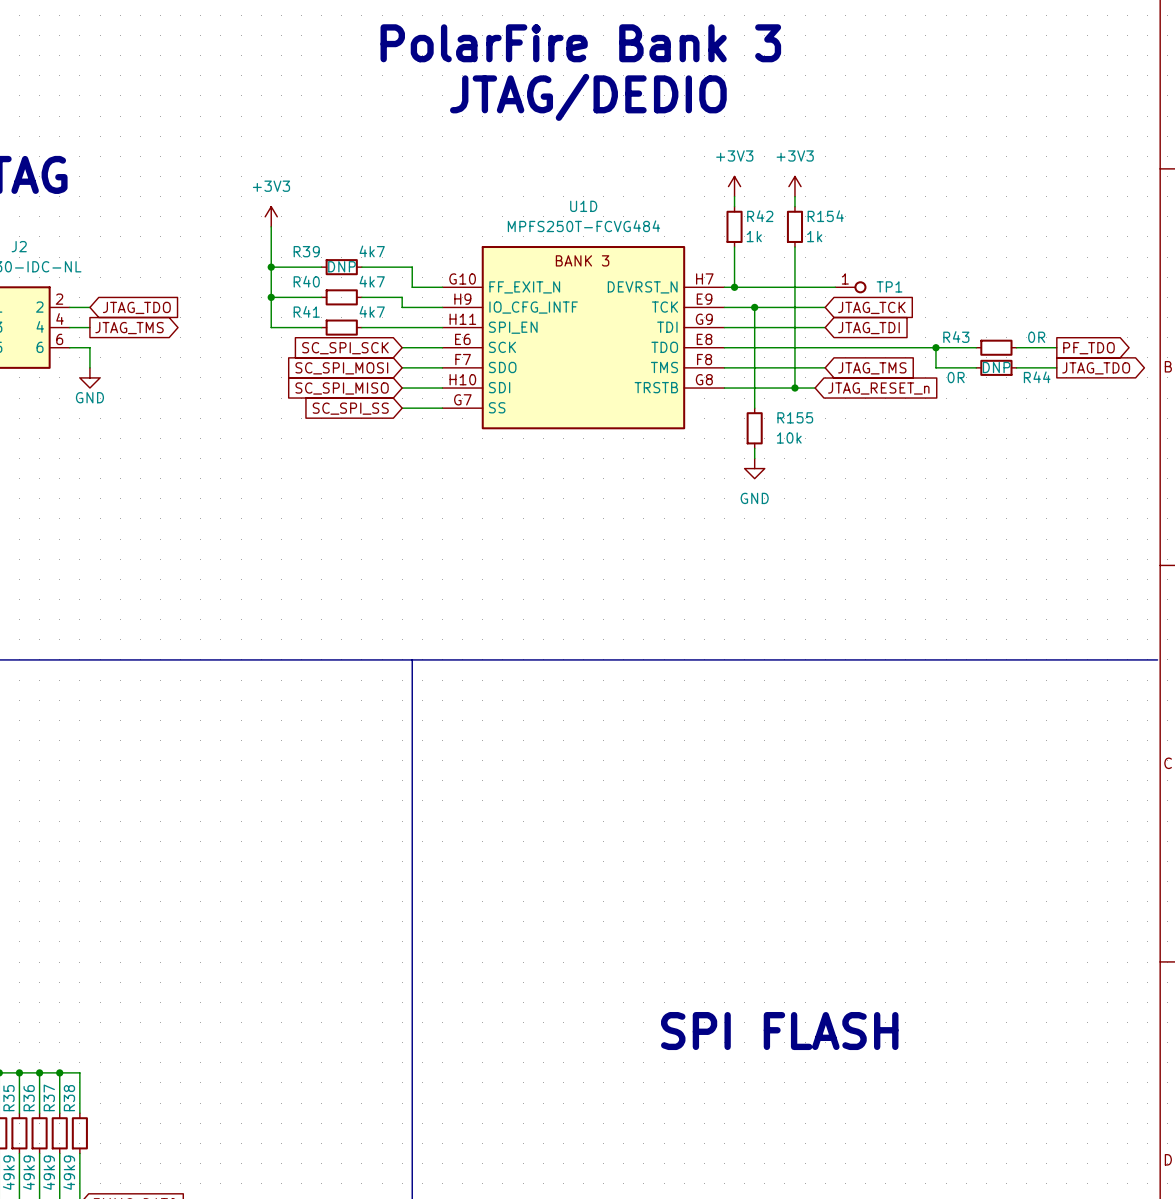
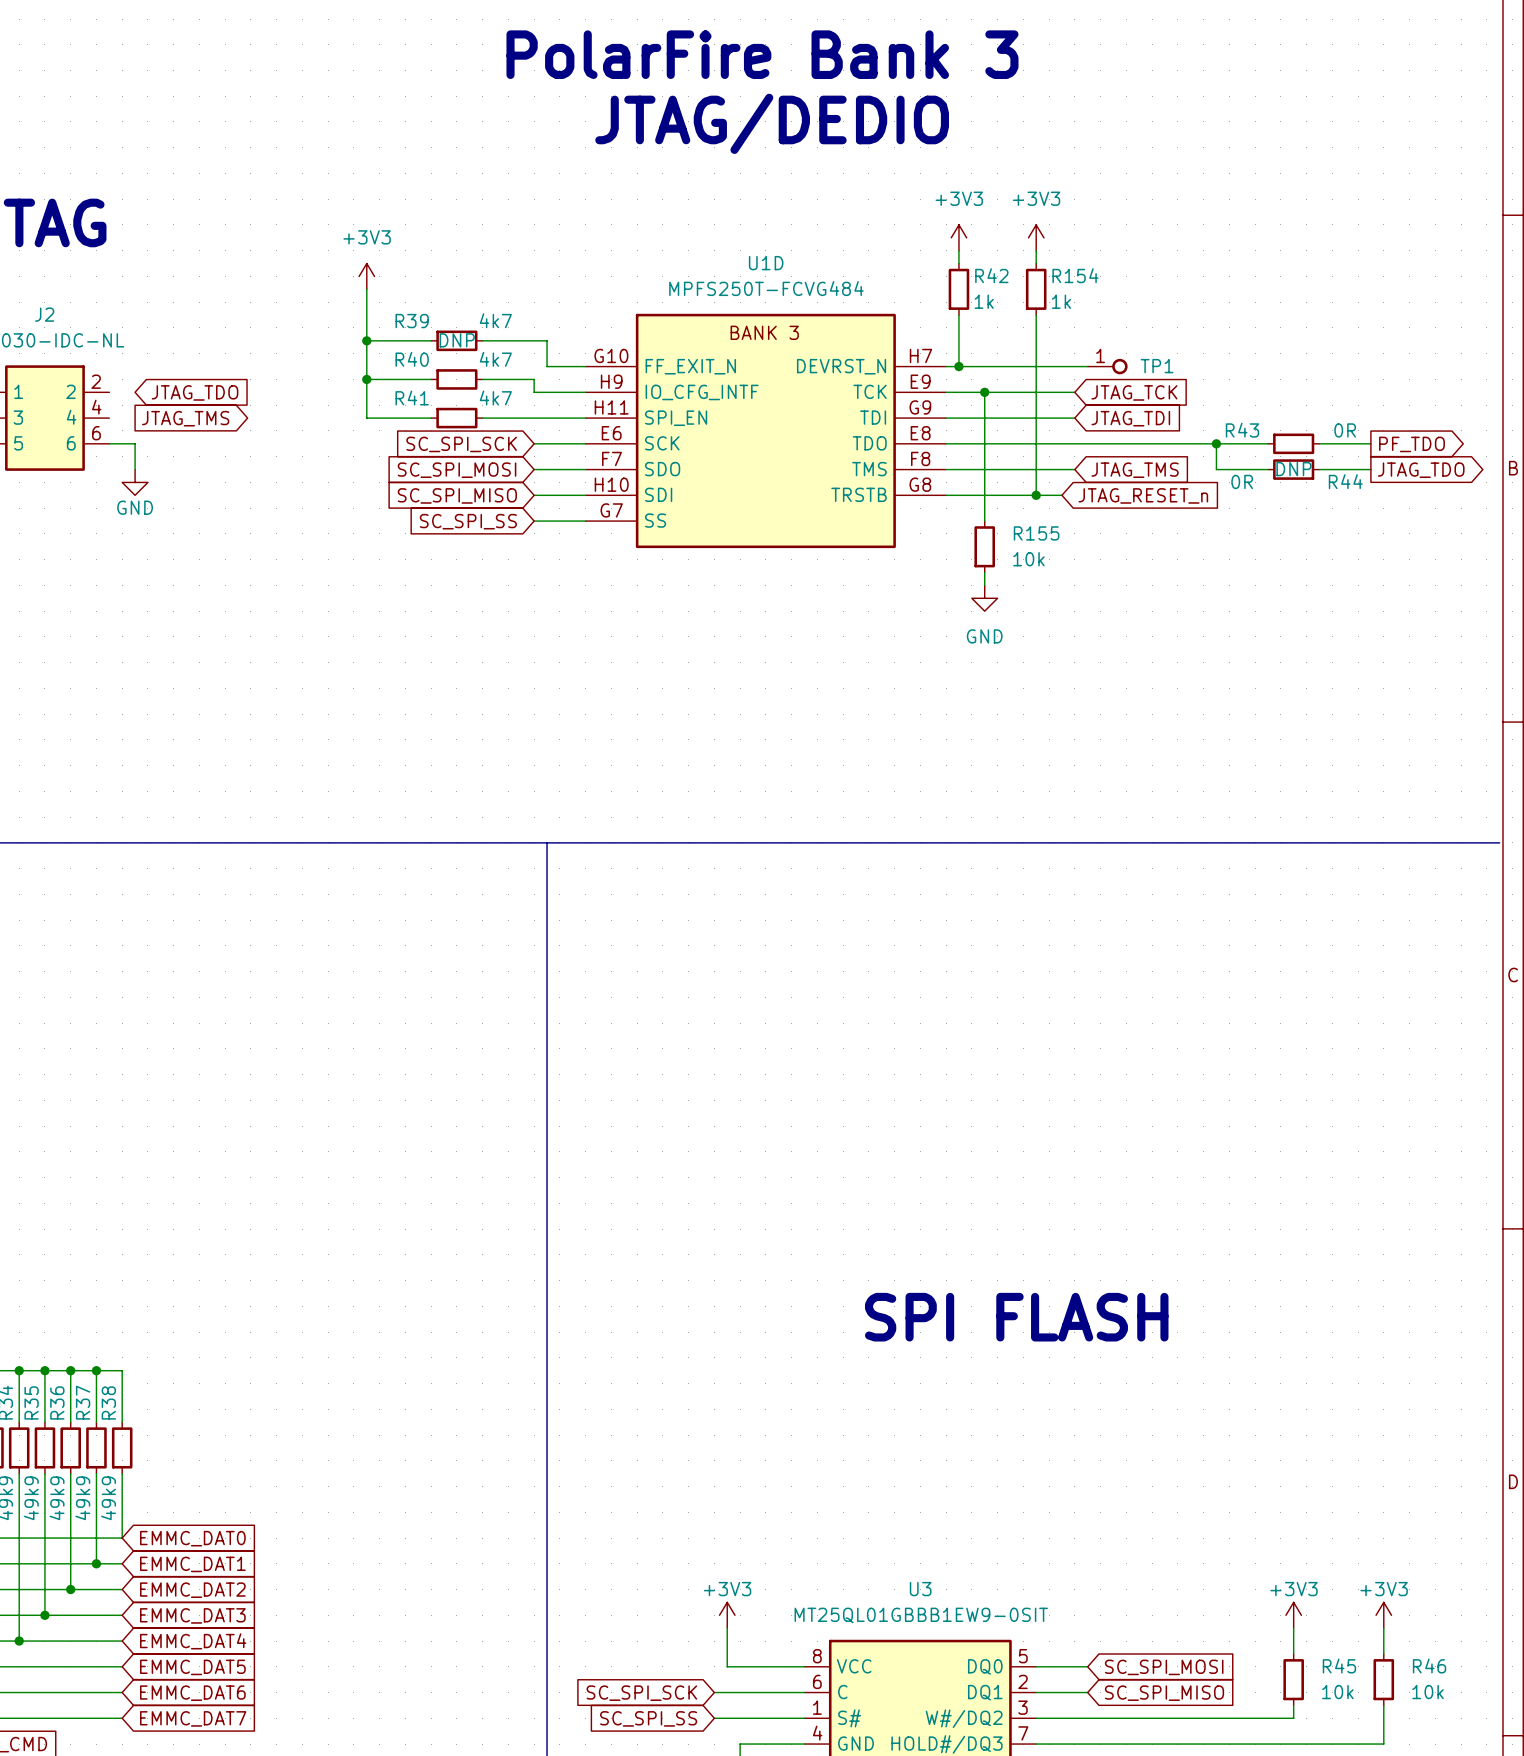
wire: (69, 307) (89, 307) -> none
wire: (69, 327) (89, 327) -> none

